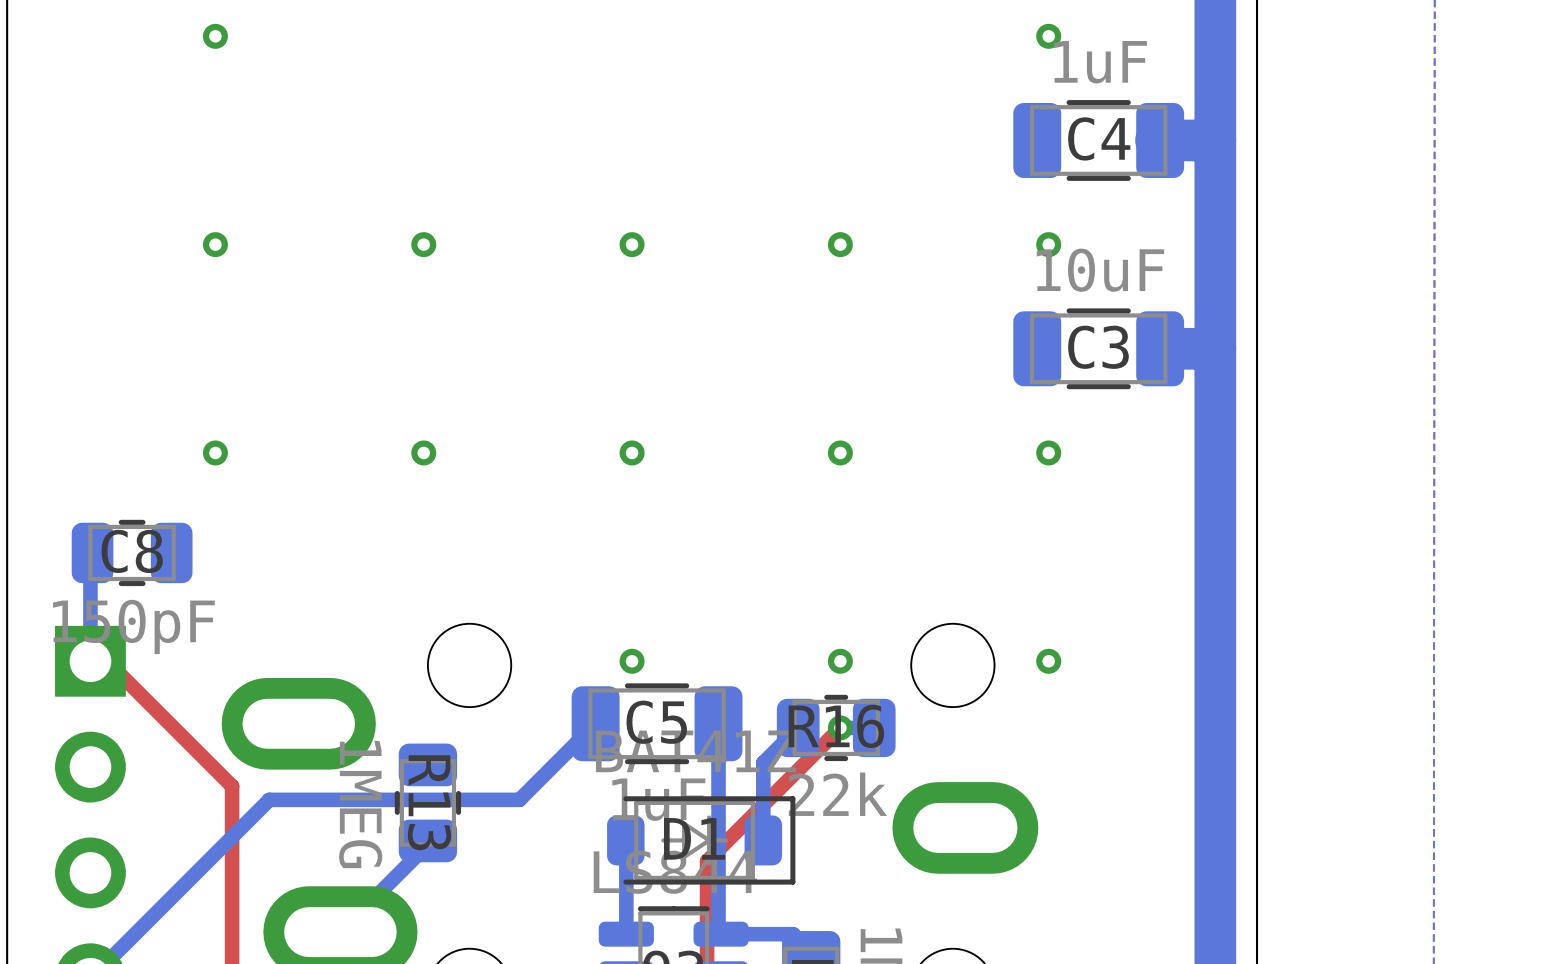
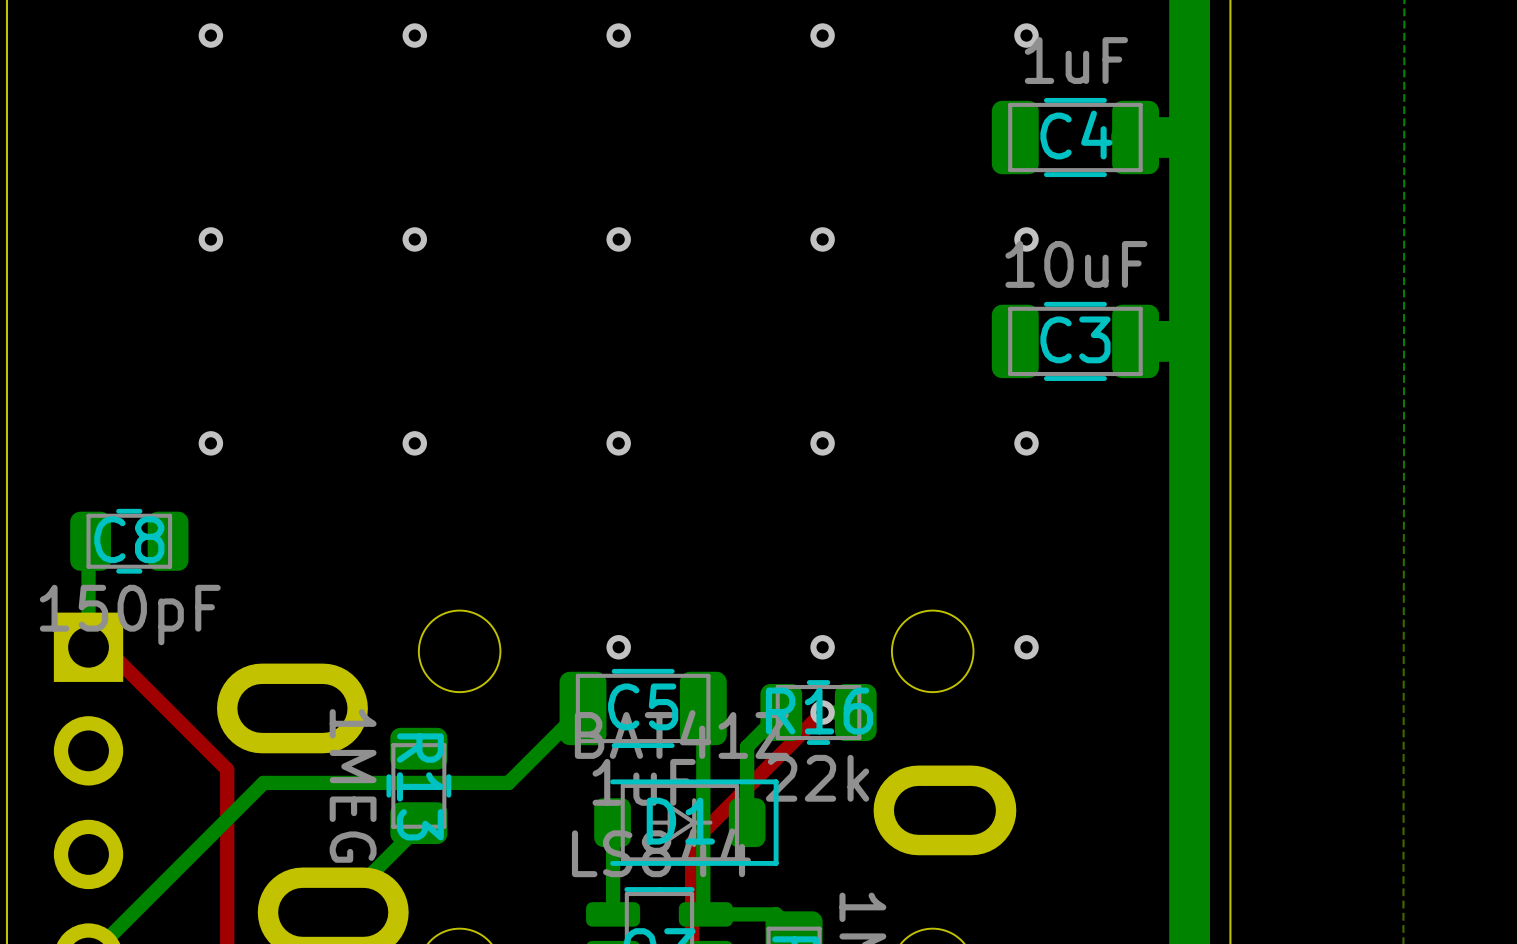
via: none -> (414, 35)
via: none -> (618, 35)
via: none -> (822, 35)

